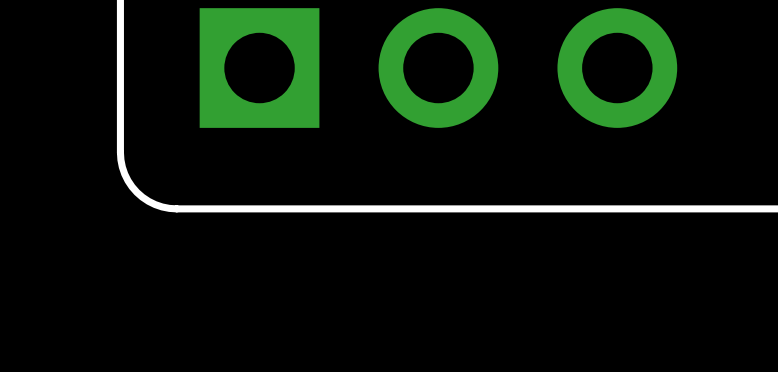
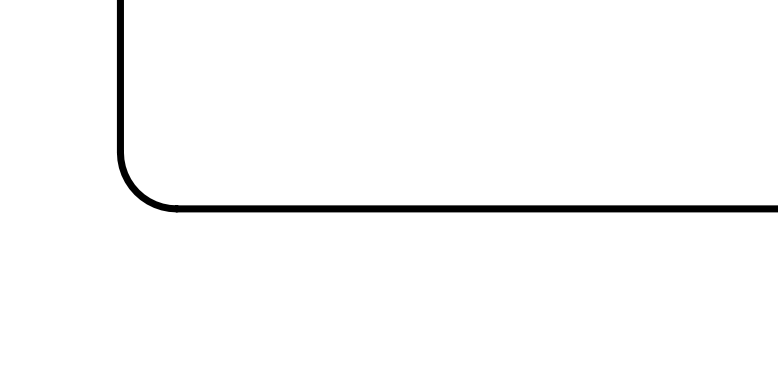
part: (438, 68) -> none

